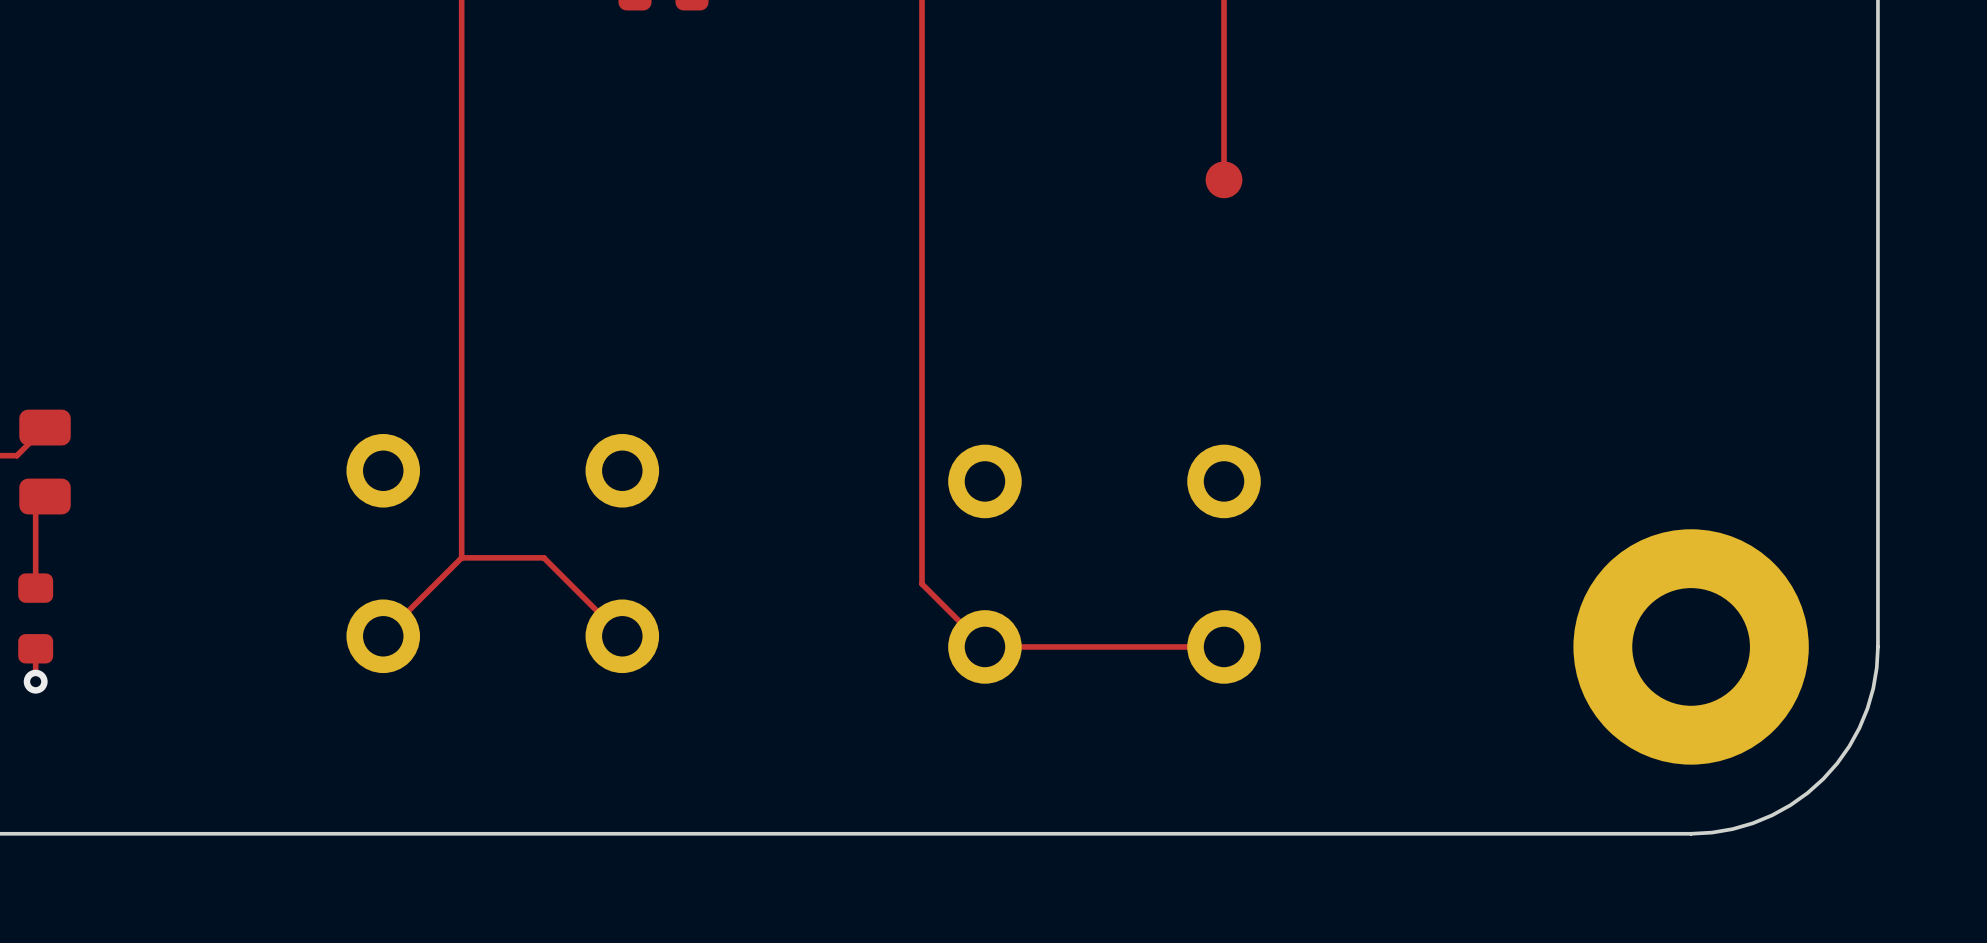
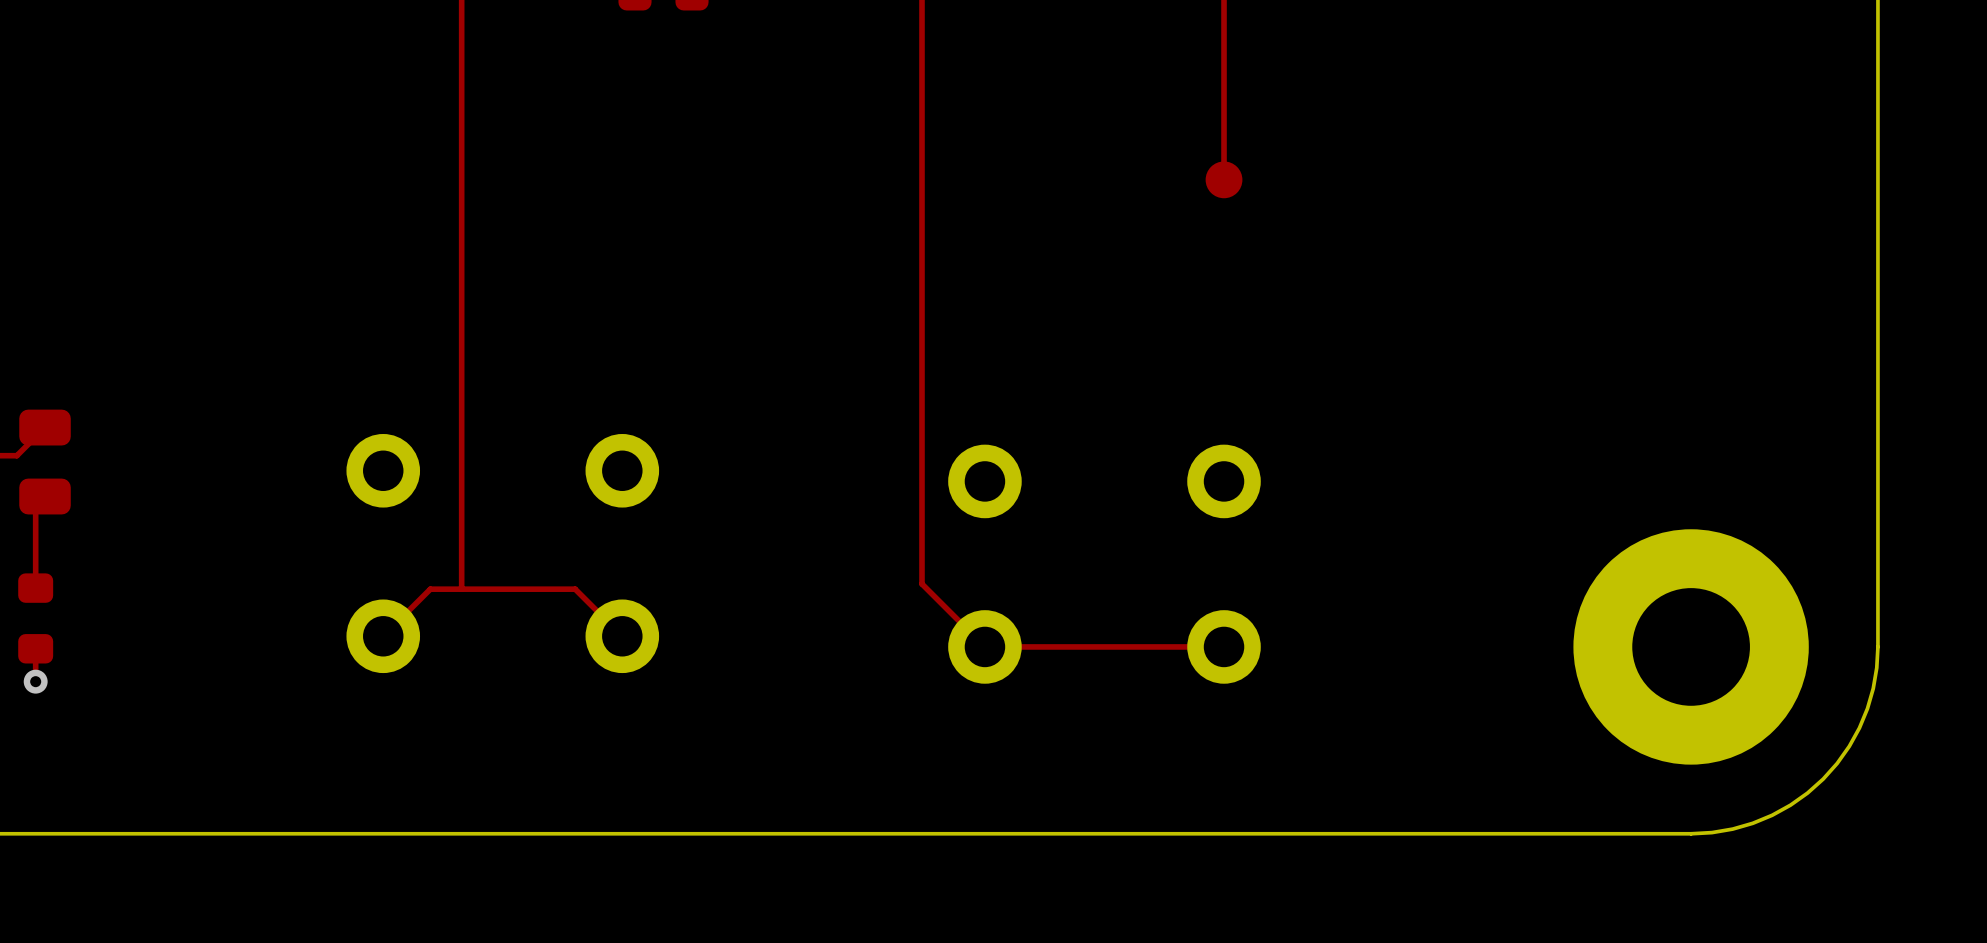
top track: none -> (461, 557) (461, 589)
top track: (575, 589) (543, 557) (461, 557) (430, 589) -> (575, 589) (430, 589)

